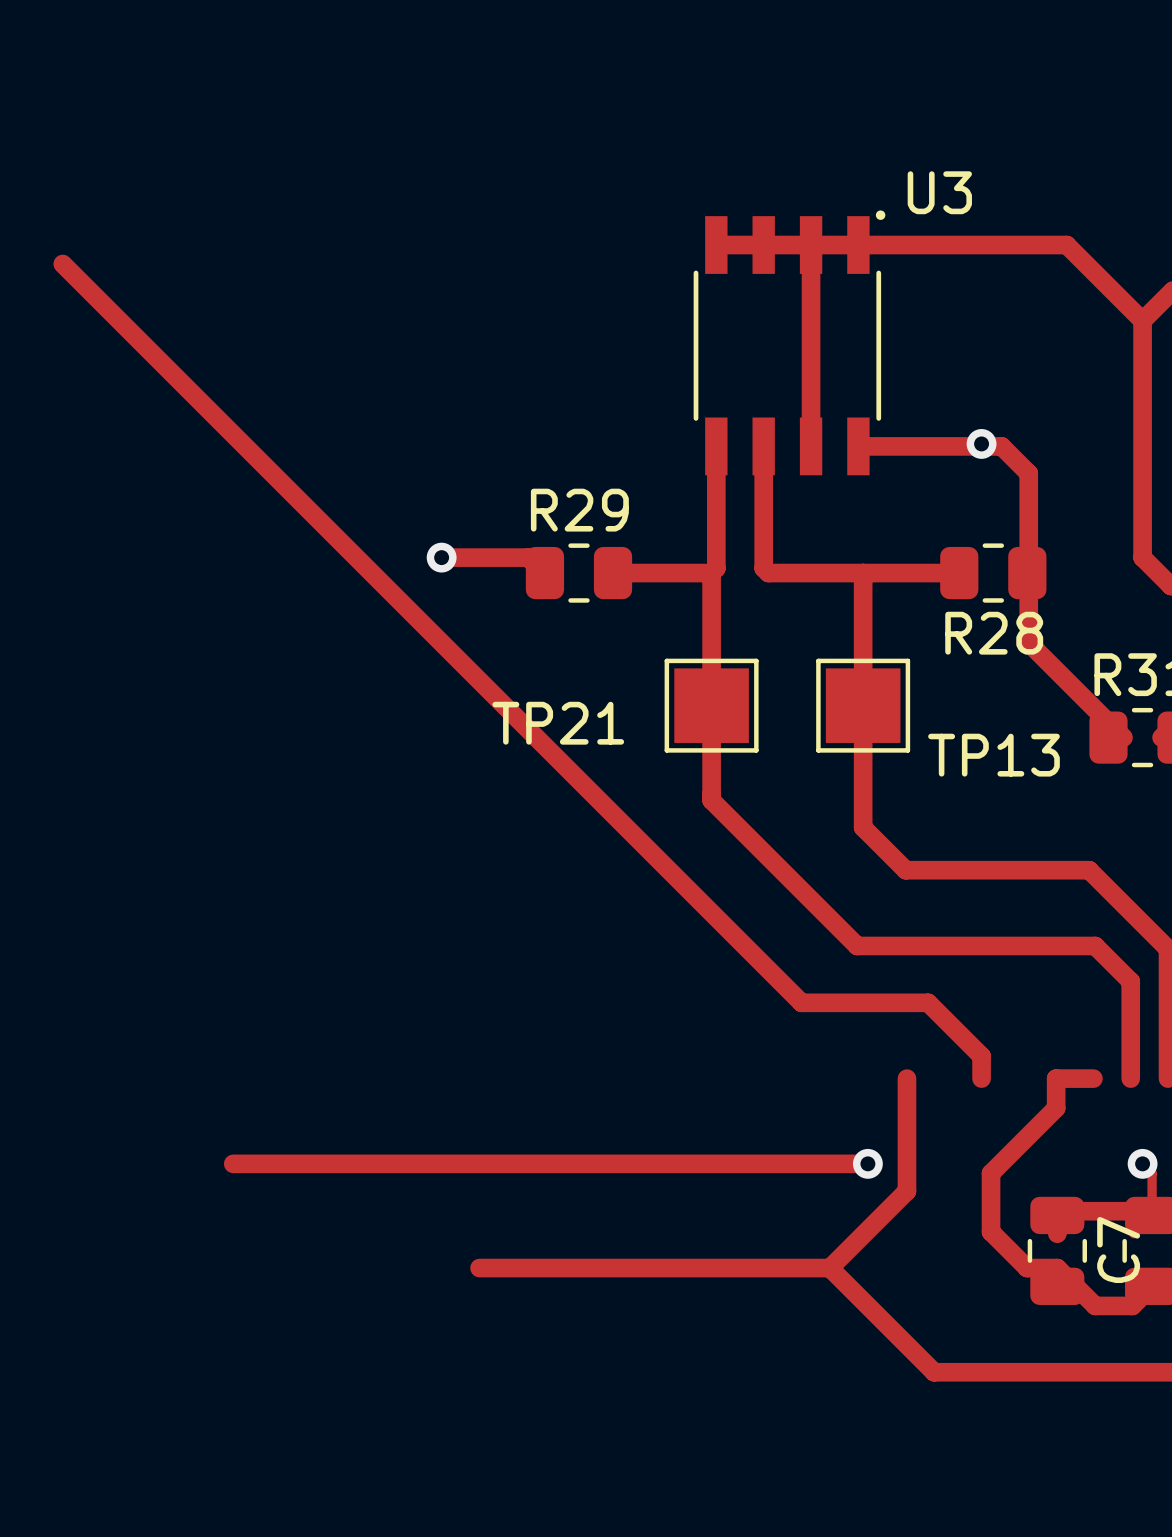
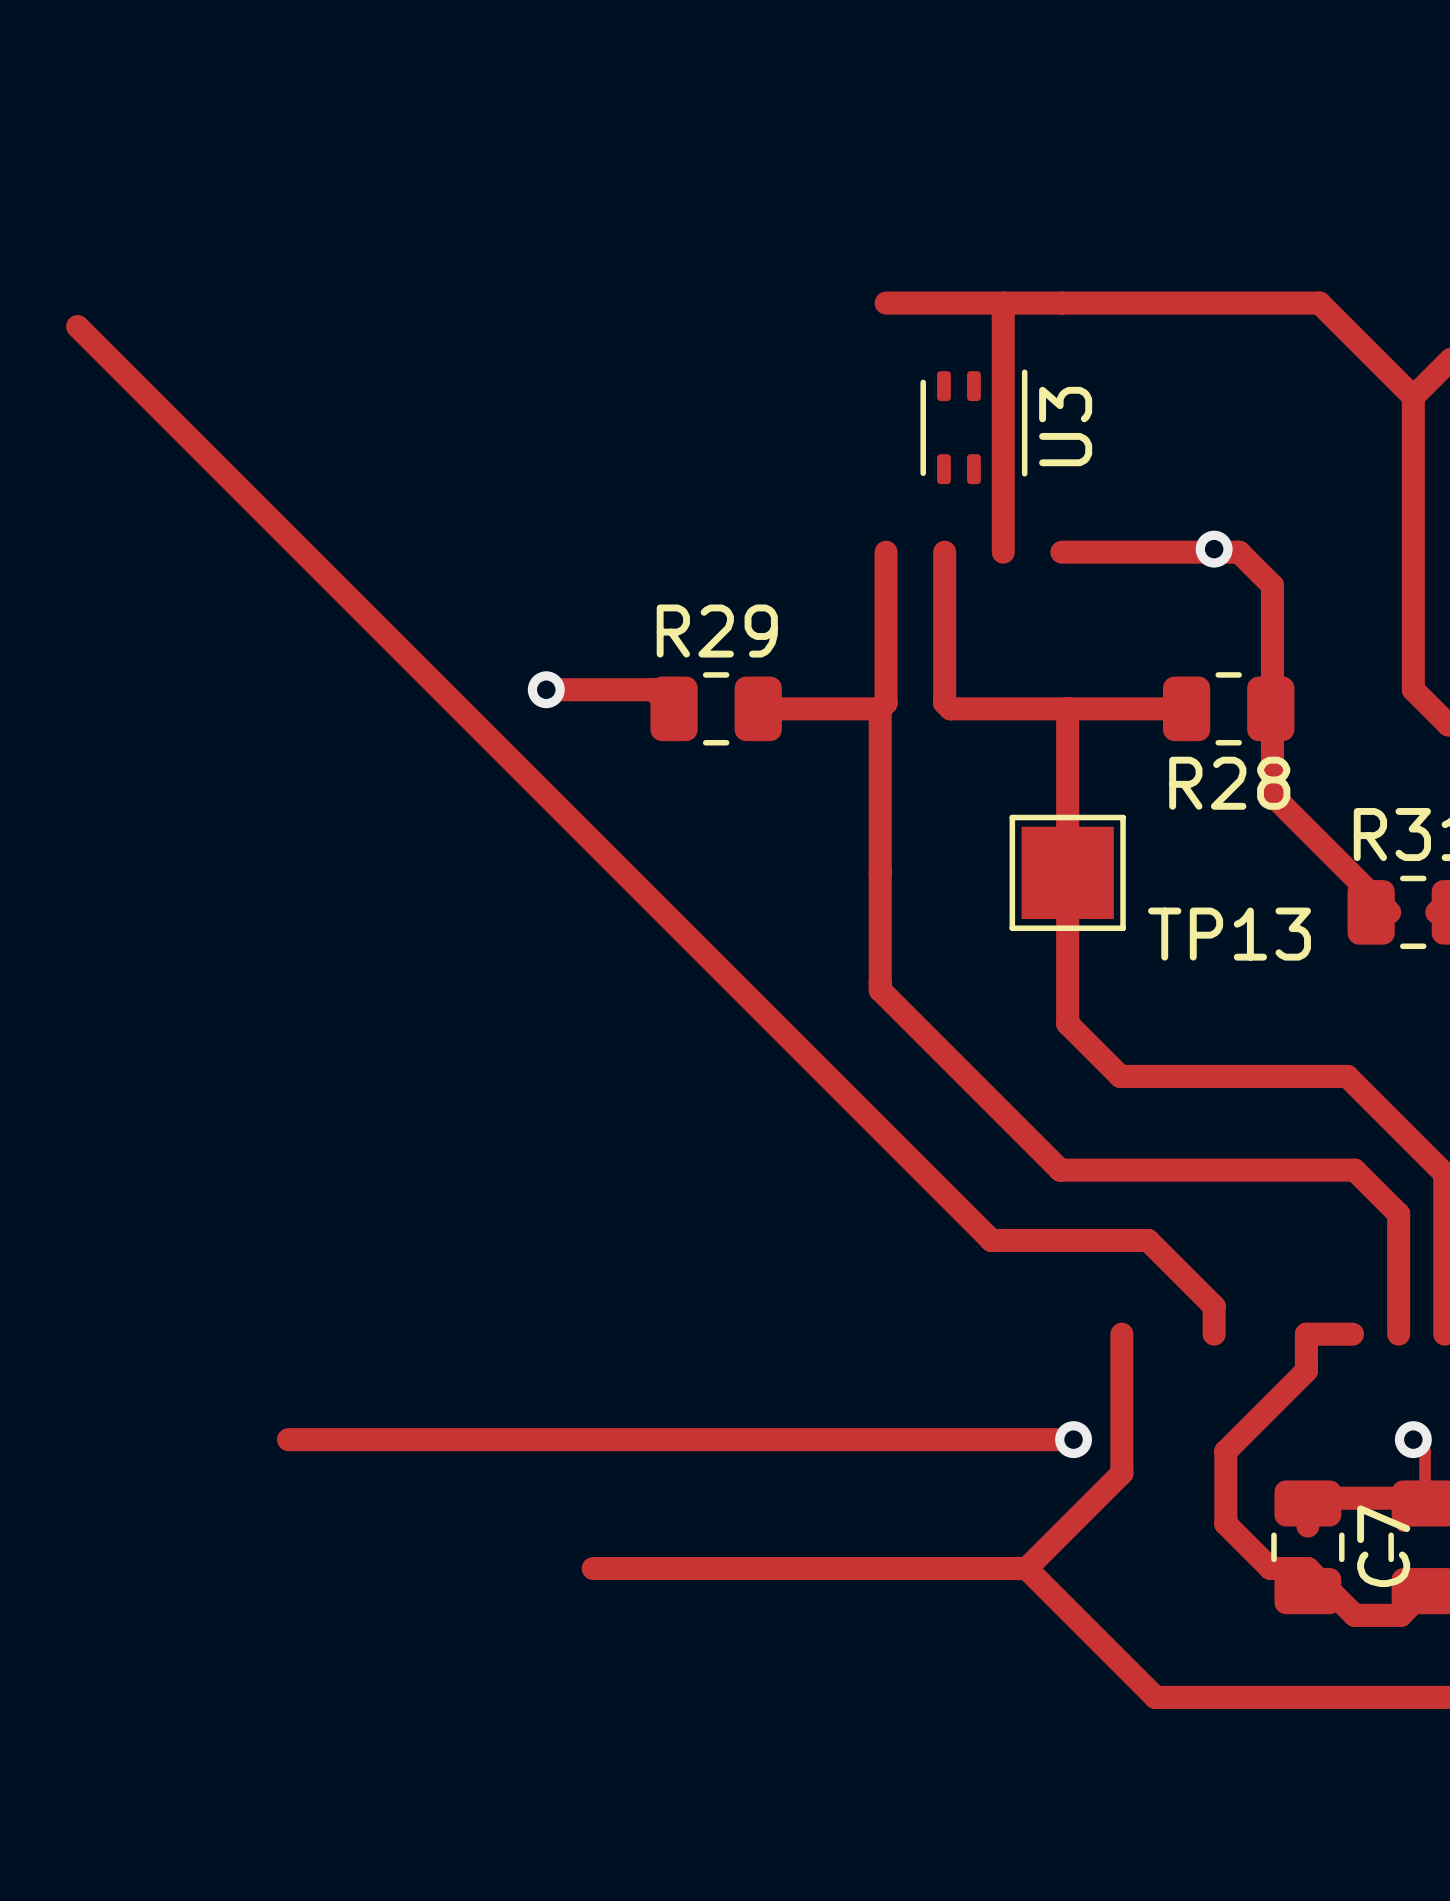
U3 name position: U3 (939, 192) -> U3 (1065, 426)
U3 footprint: [693, 210, 886, 476] -> [920, 369, 1028, 485]
TP21: (711, 705) -> none

